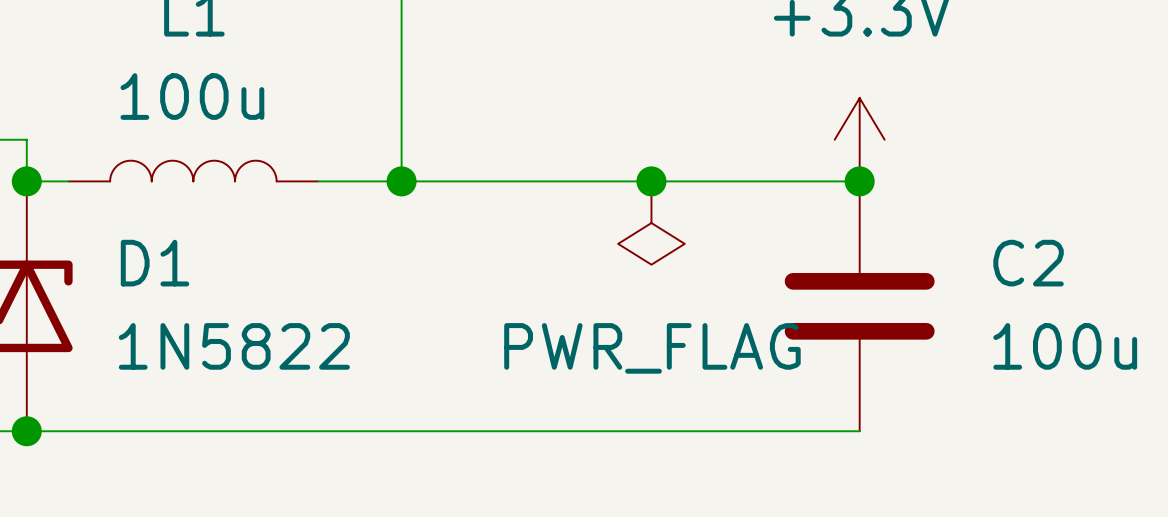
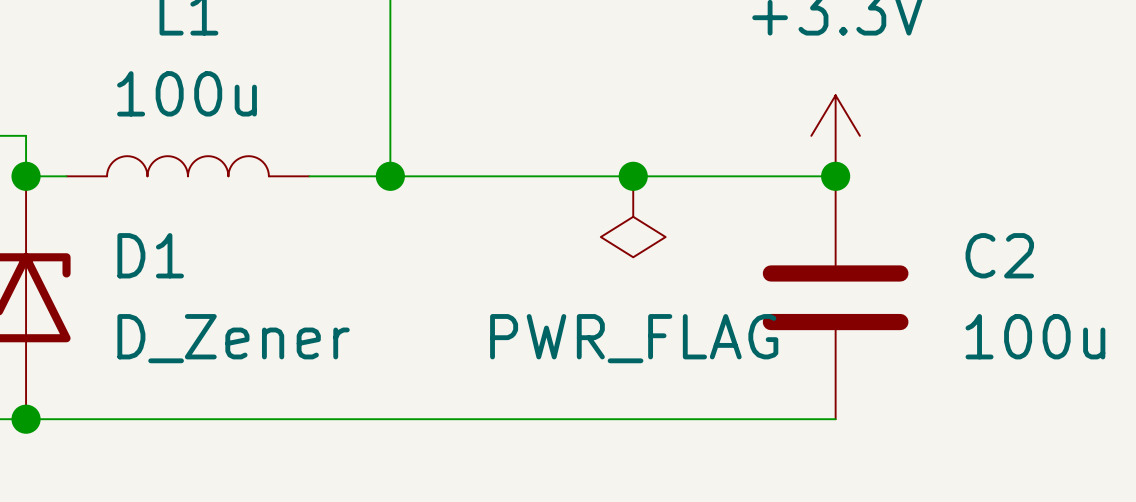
D1 value: 1N5822 (234, 346) -> D_Zener (233, 338)

